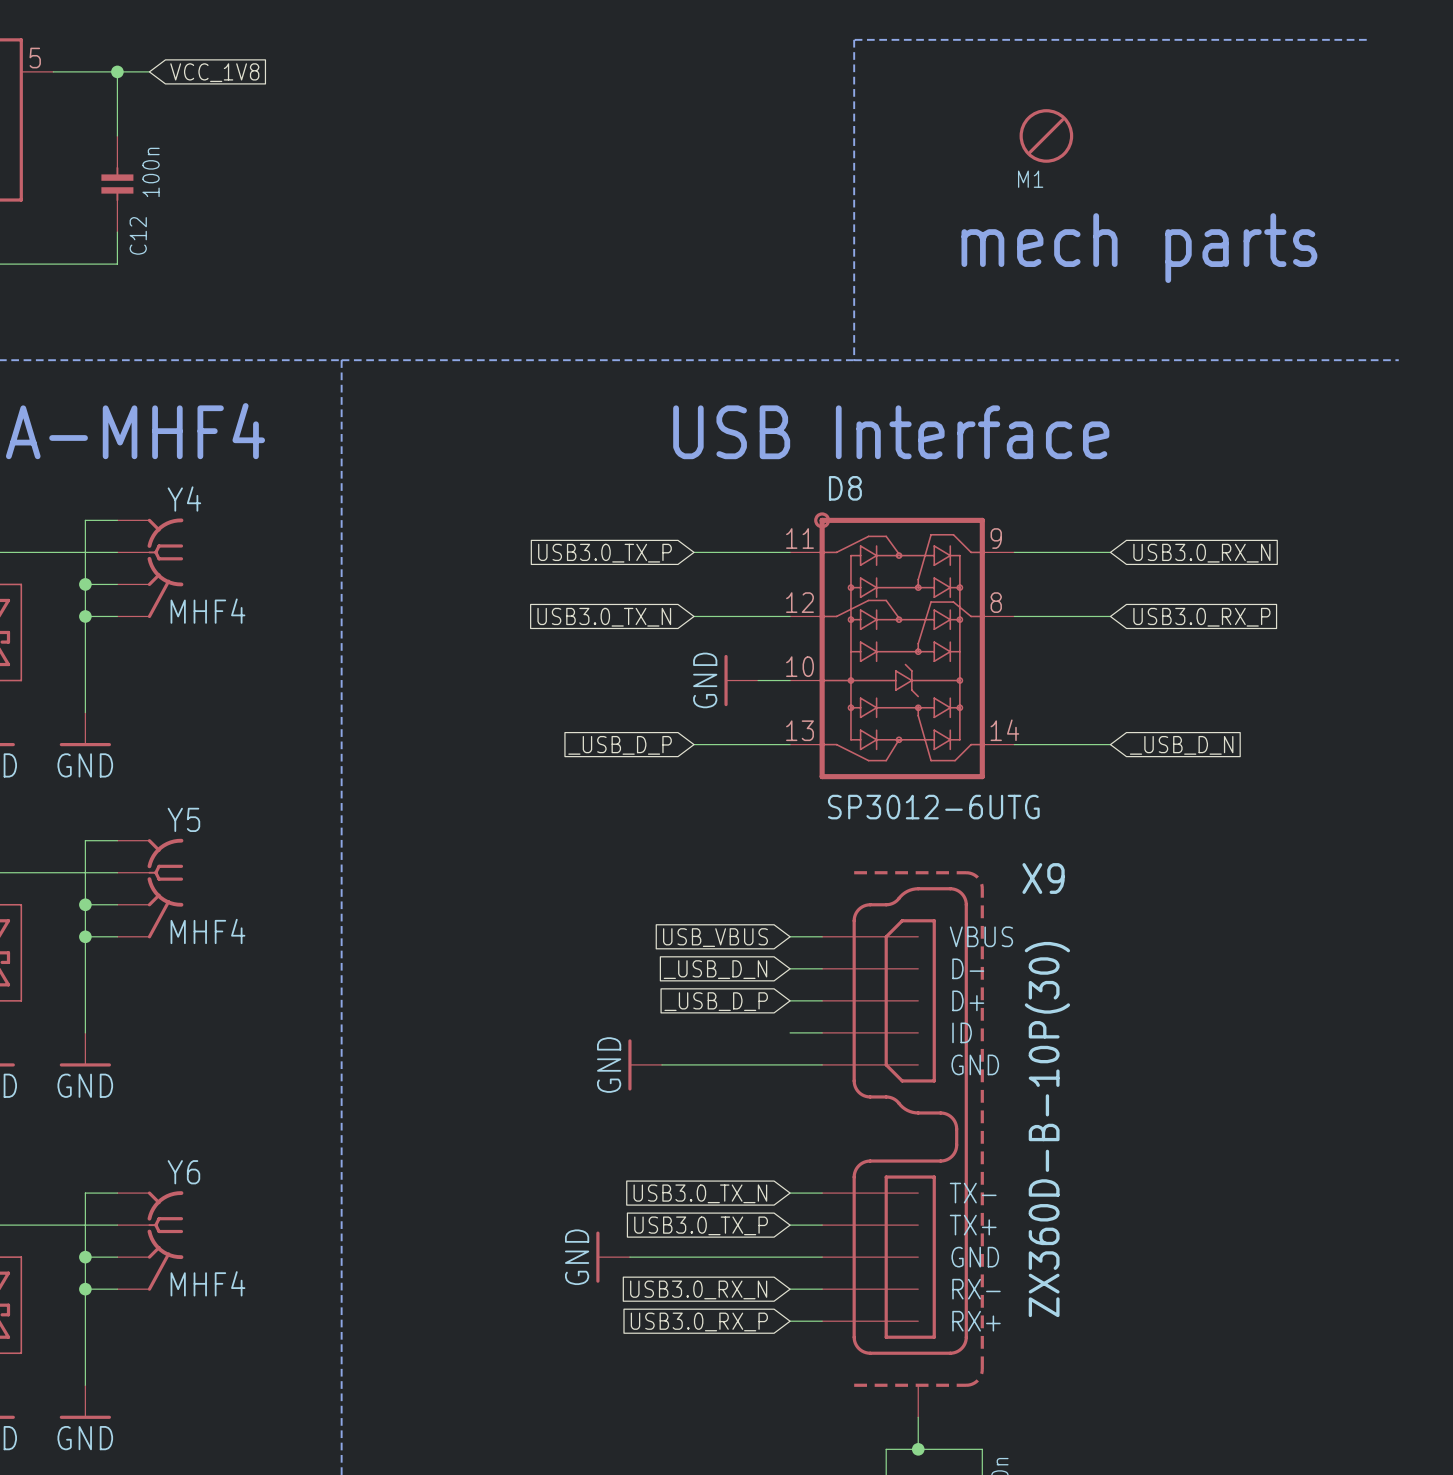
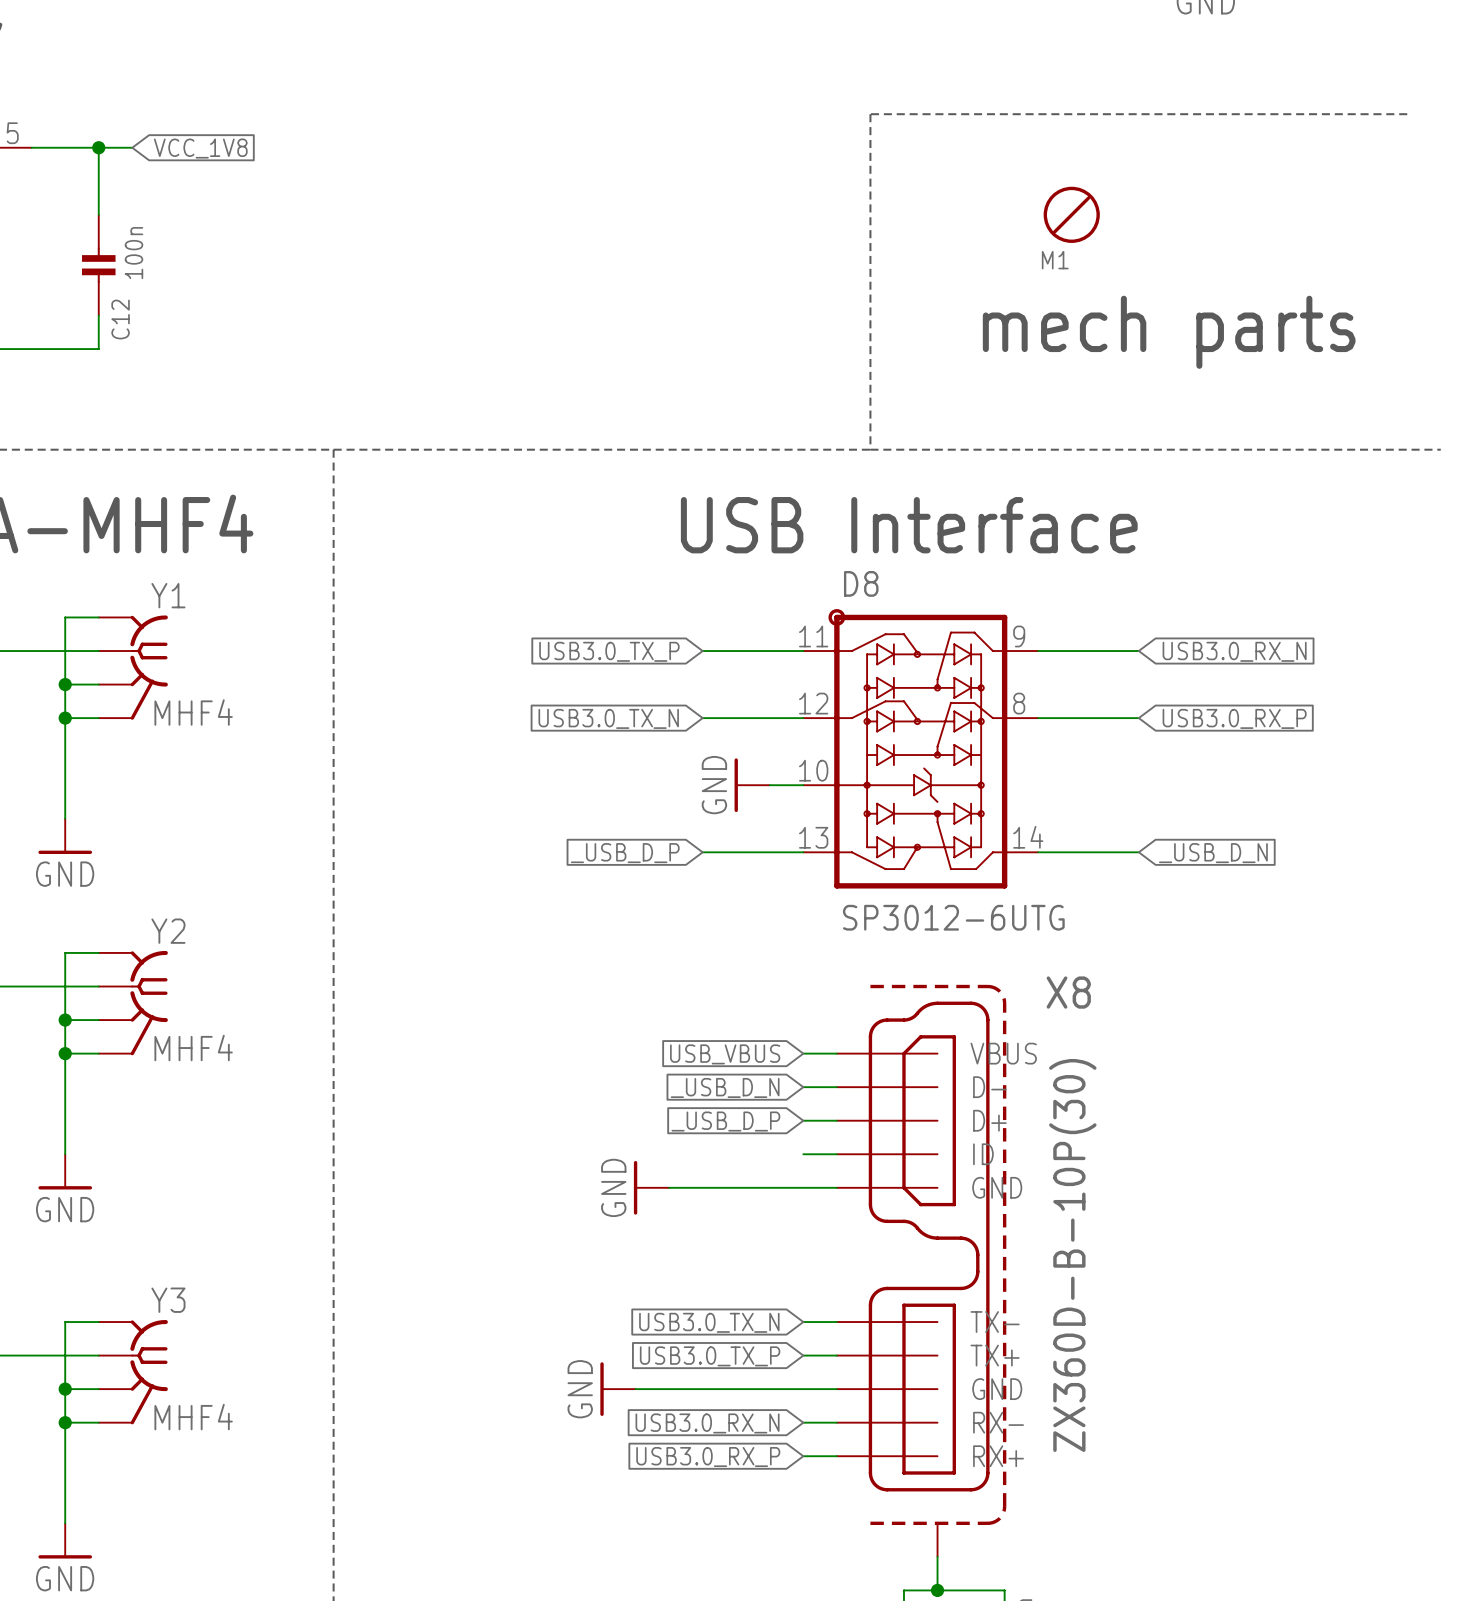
Y4 name: Y4 (184, 499) -> Y1 (168, 595)
Y5 name: Y5 (183, 819) -> Y2 (168, 931)
X9 name: X9 (1043, 878) -> X8 (1068, 992)
Y6 name: Y6 (183, 1172) -> Y3 (168, 1300)

